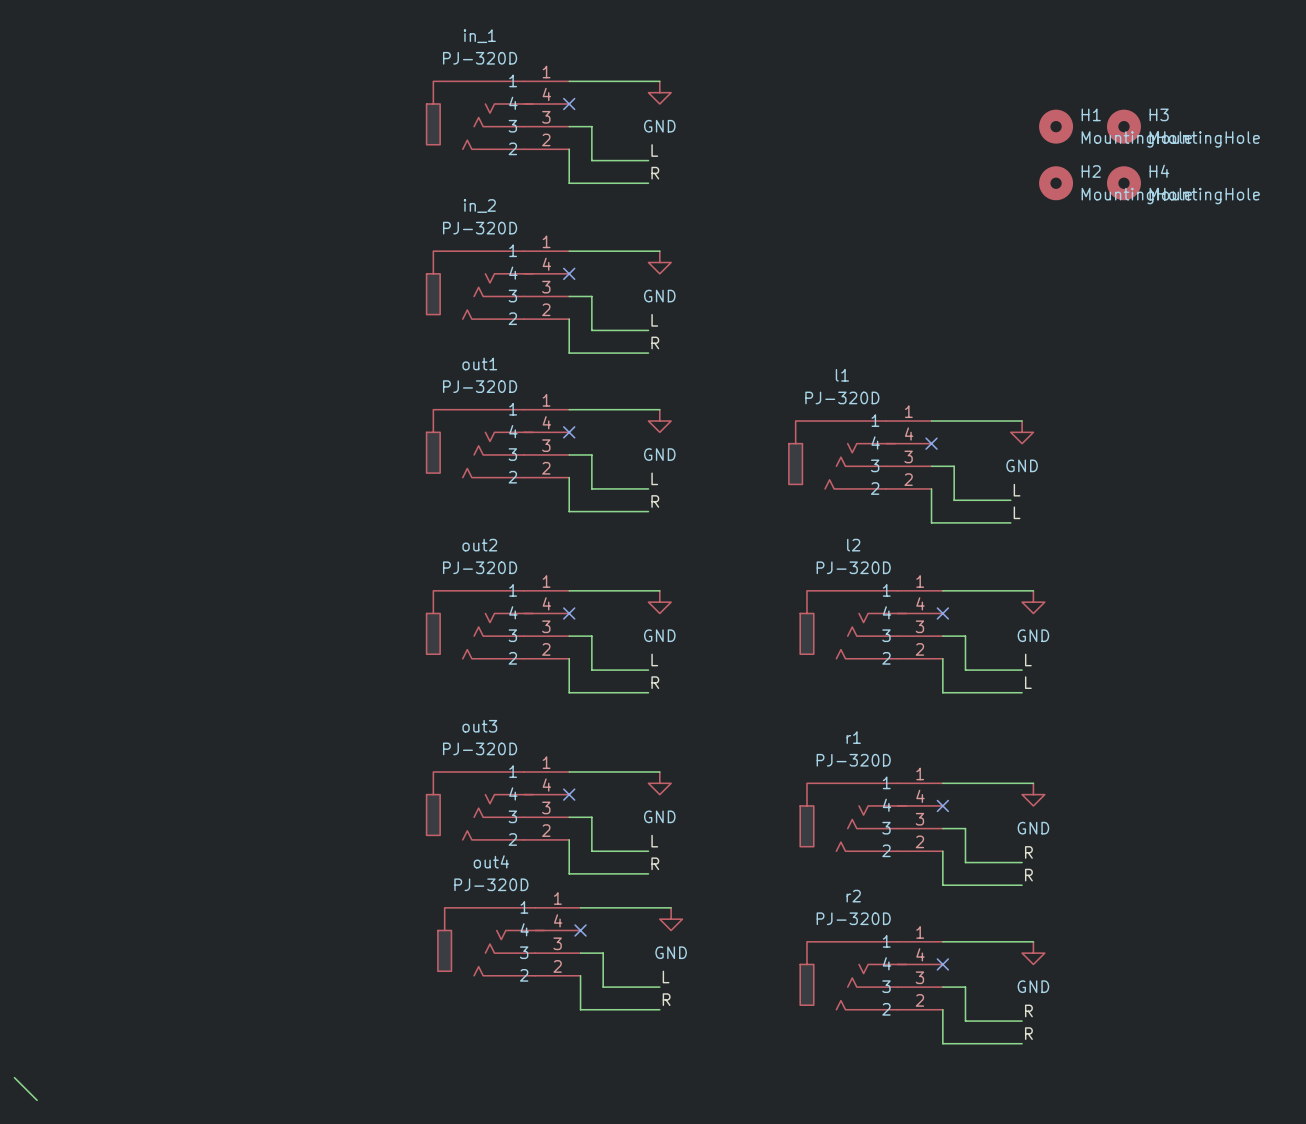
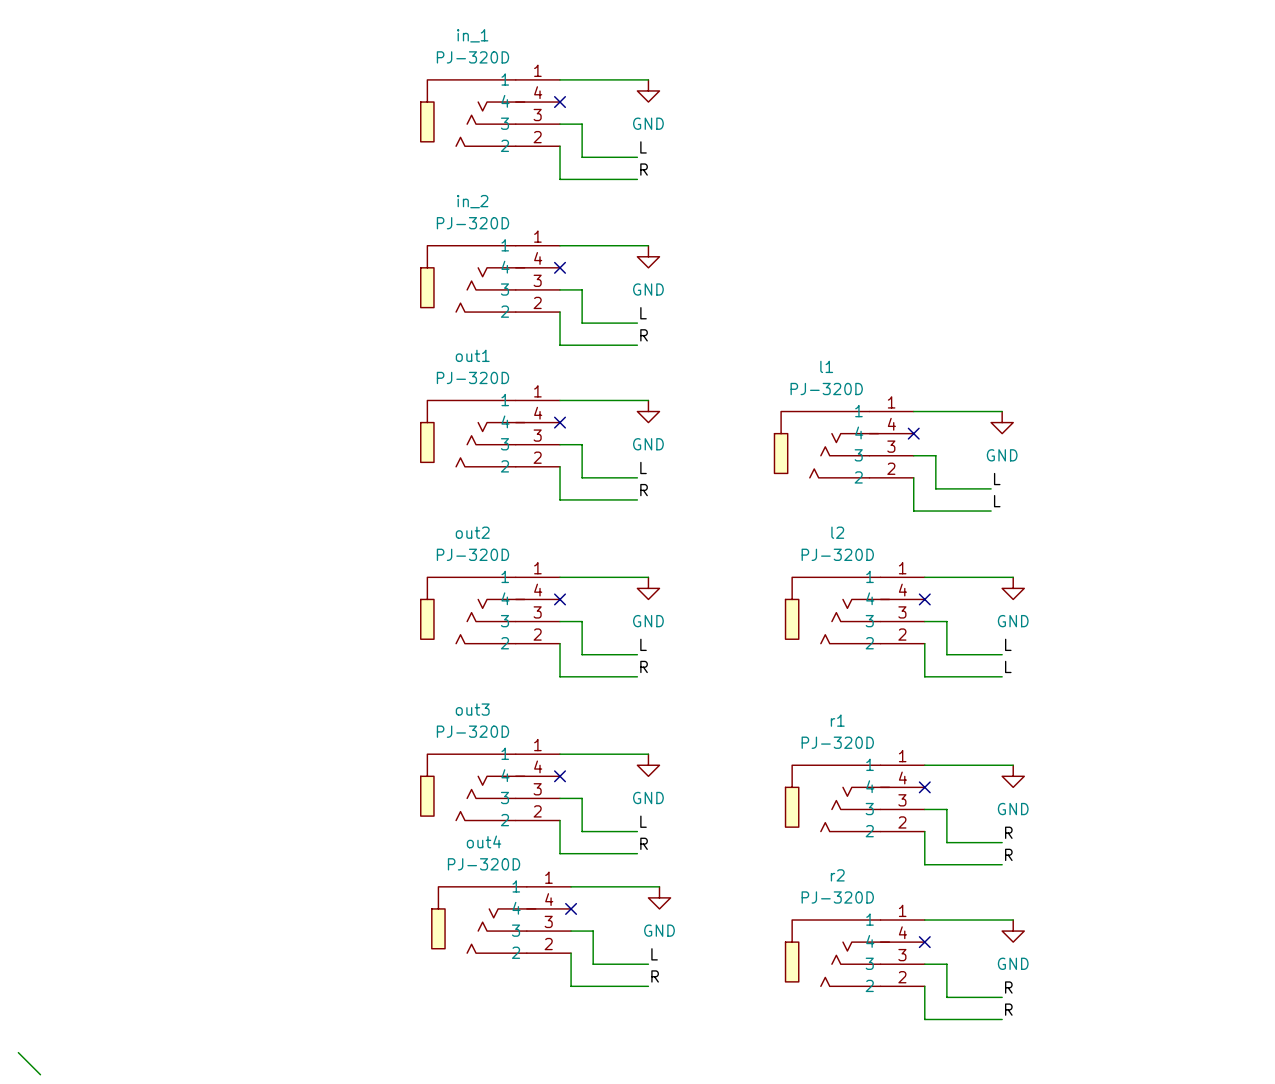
H1: MountingHole (1056, 126) -> none
H3: MountingHole (1123, 126) -> none
H2: MountingHole (1056, 183) -> none
H4: MountingHole (1123, 183) -> none

